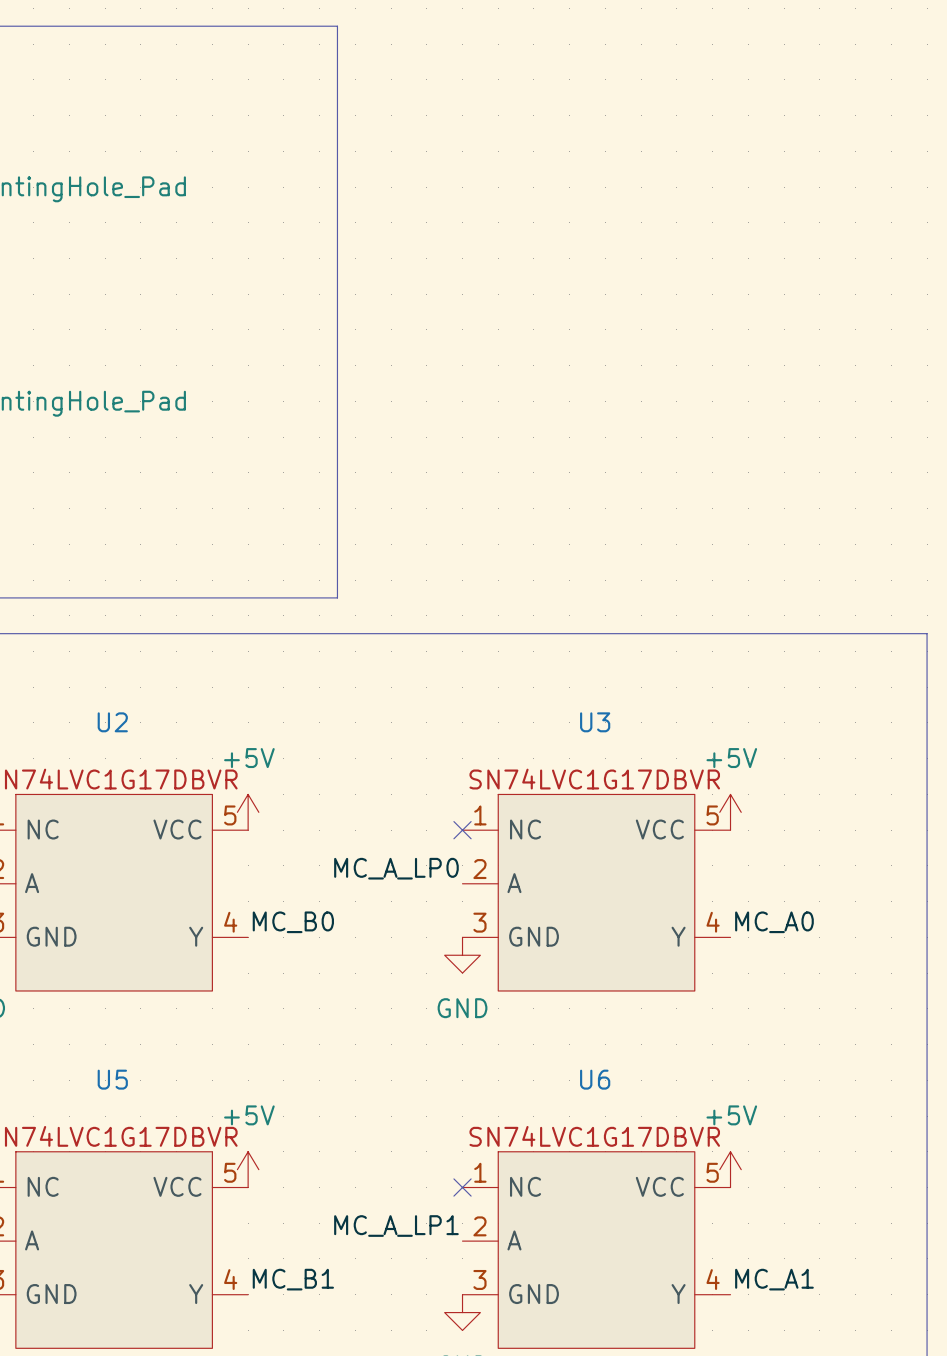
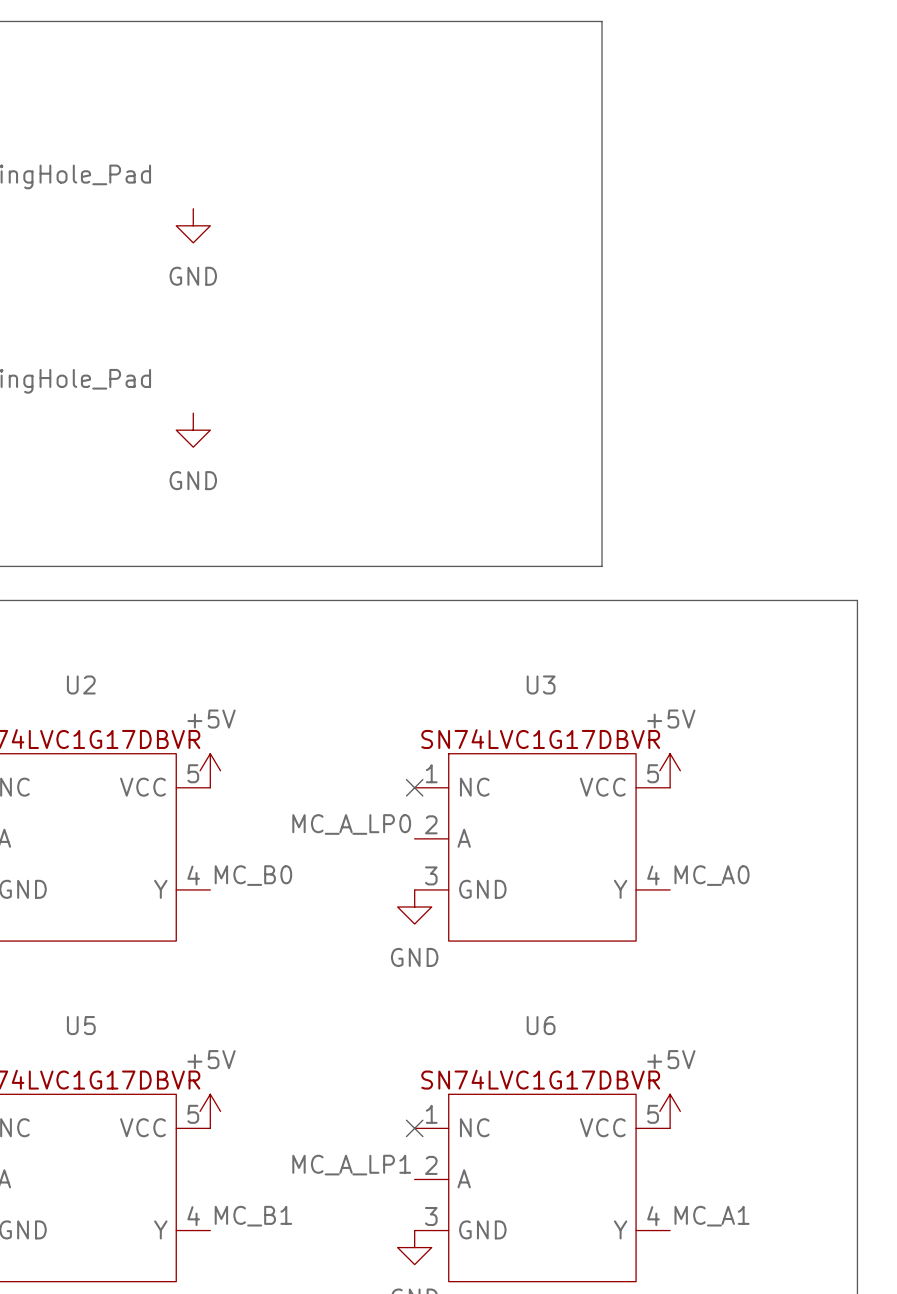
line: (337, 26) (337, 597) -> (295, 21) (601, 21) (601, 566) (295, 566)
power symbol: none -> GND (193, 225)
power symbol: none -> GND (193, 430)

